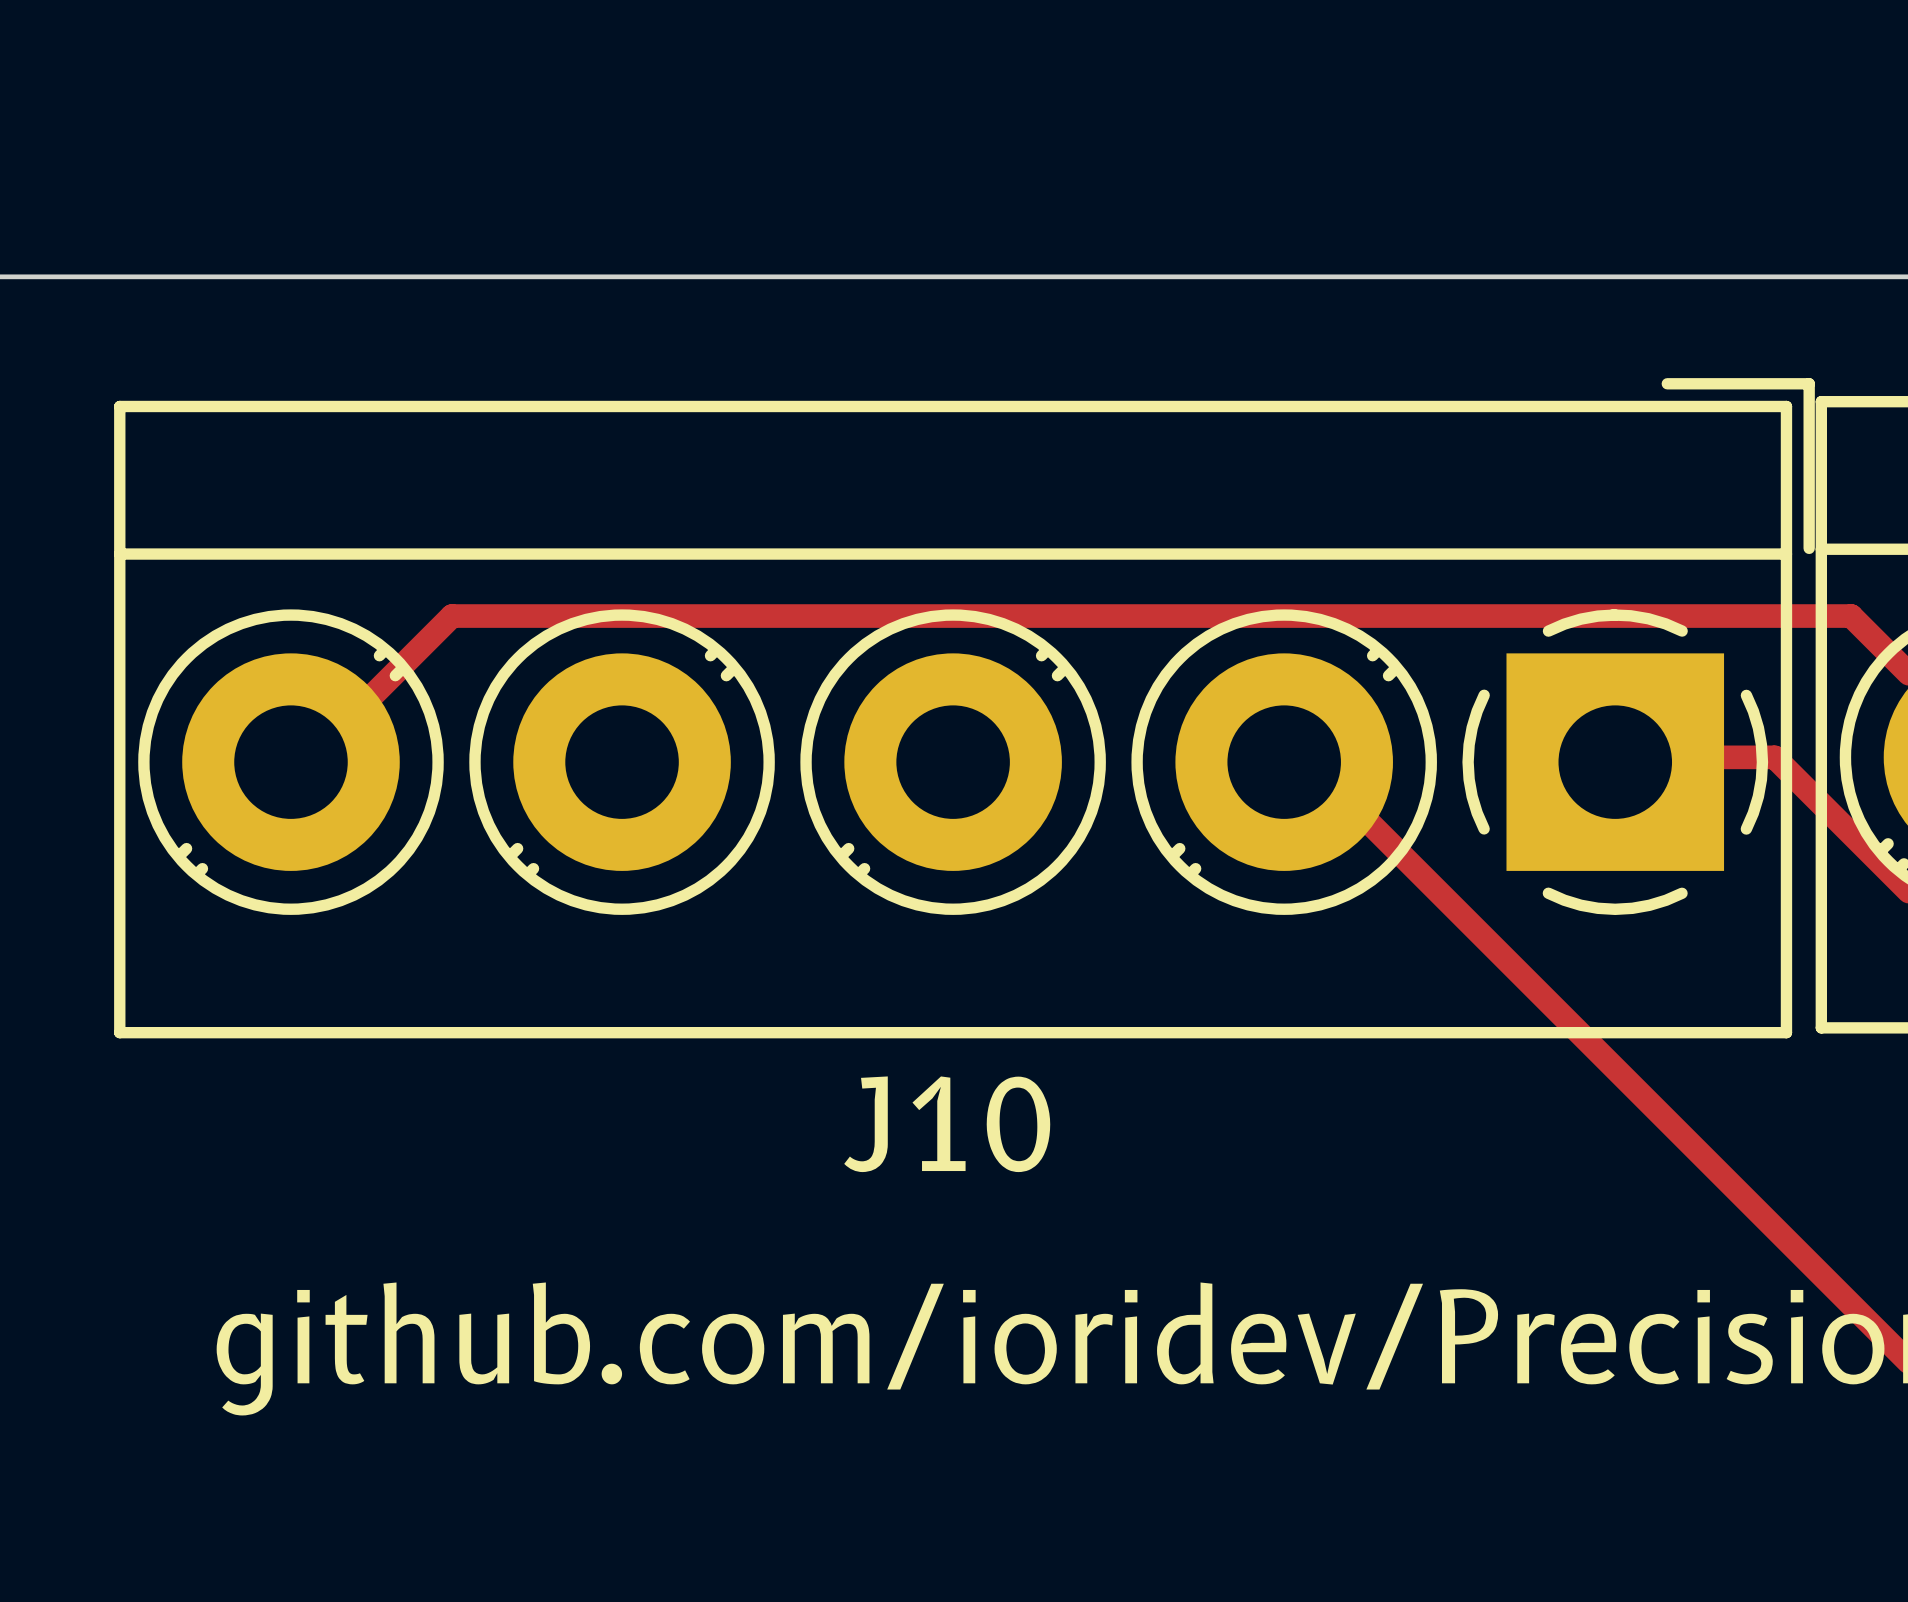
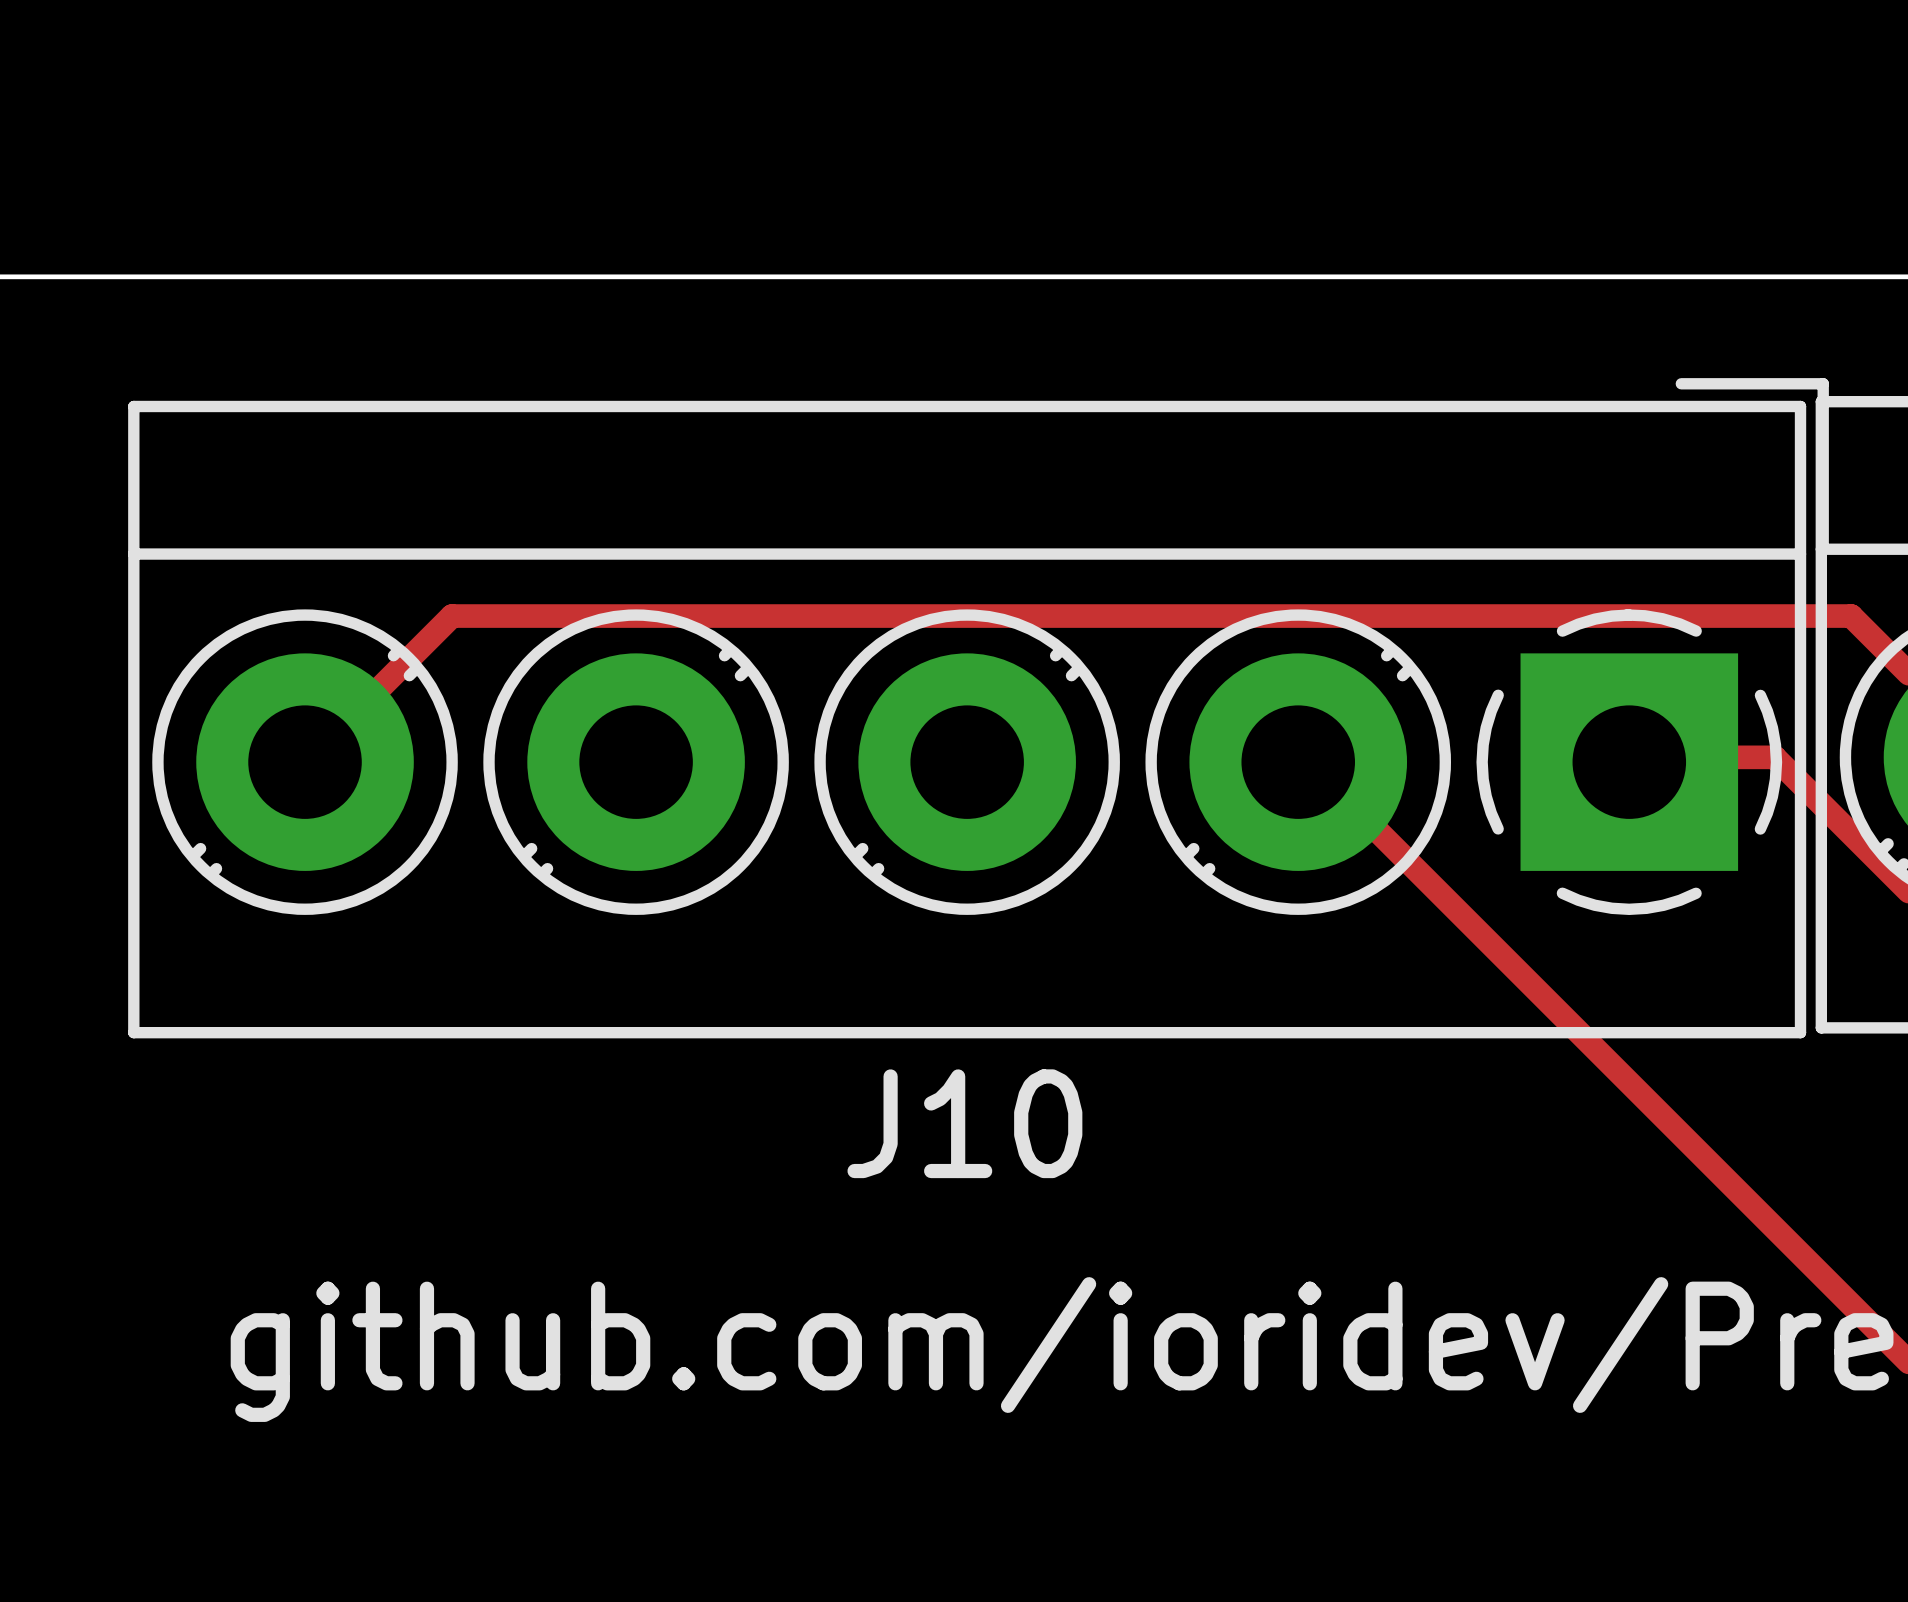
J10 position: (964, 708) -> (978, 708)

